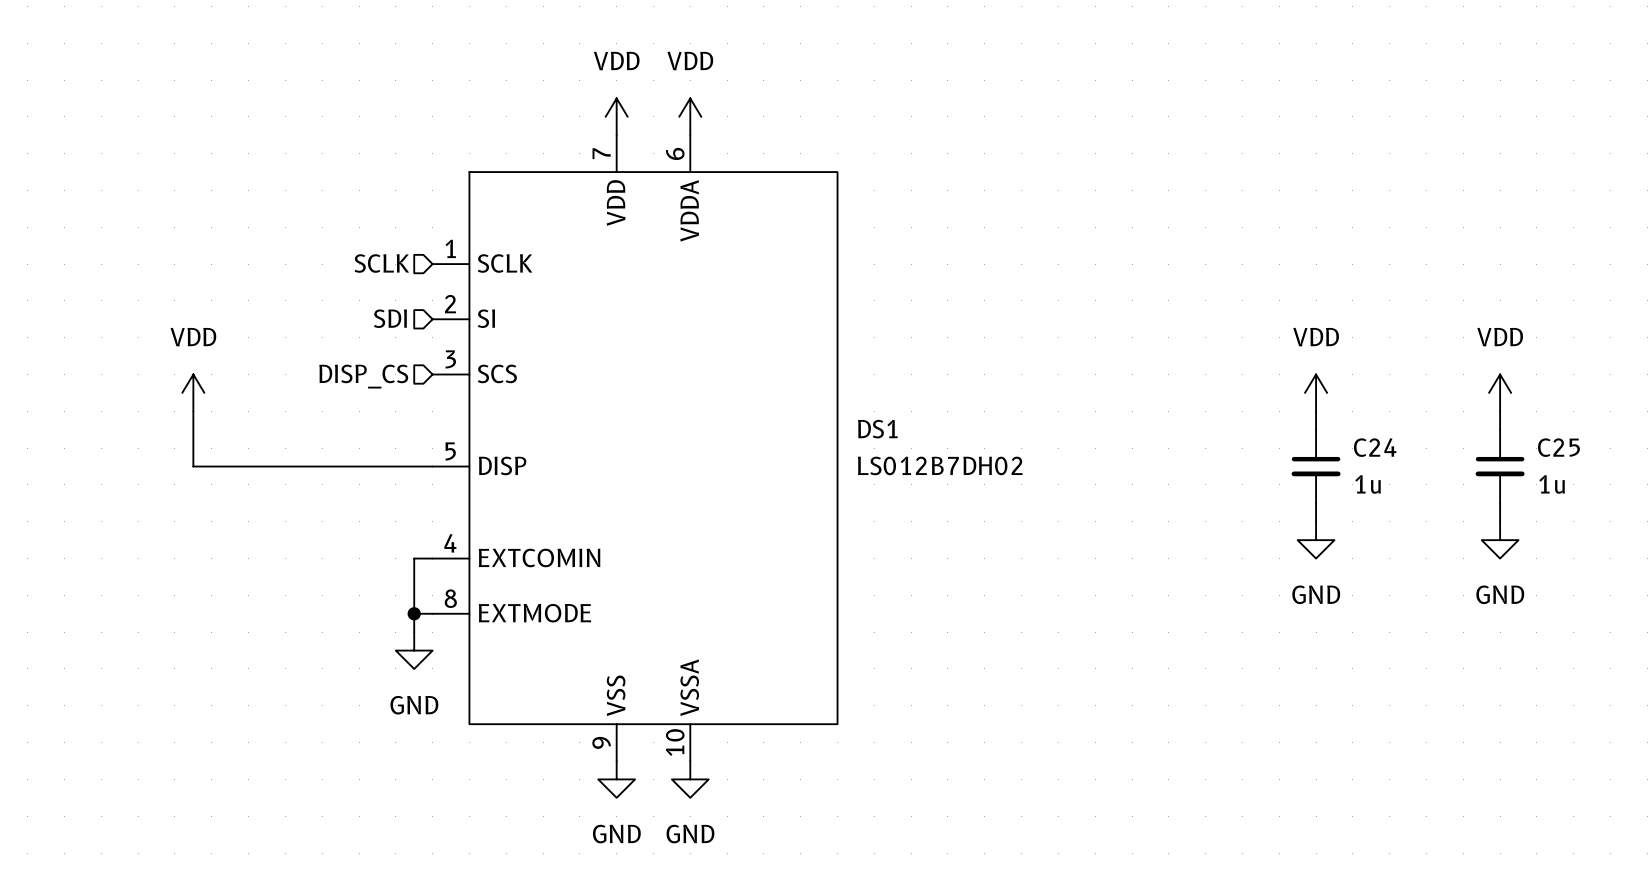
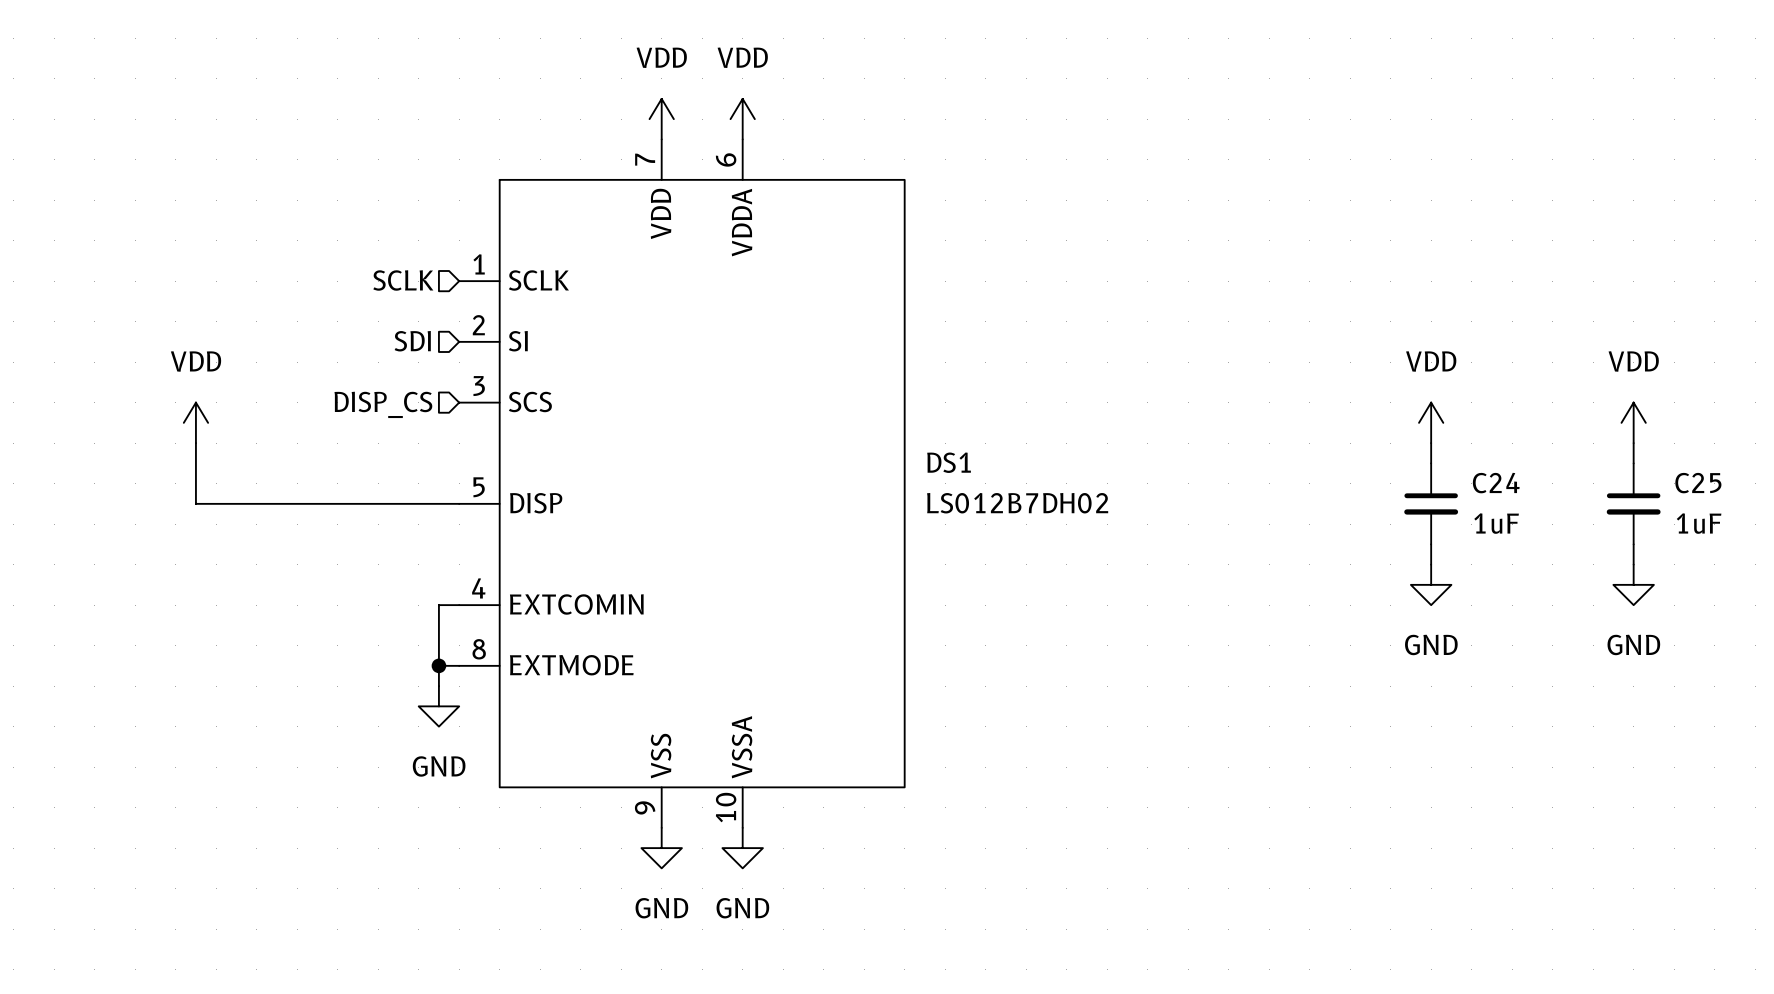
C24 value: 1u (1367, 484) -> 1uF (1496, 523)
C25 value: 1u (1552, 484) -> 1uF (1699, 523)

